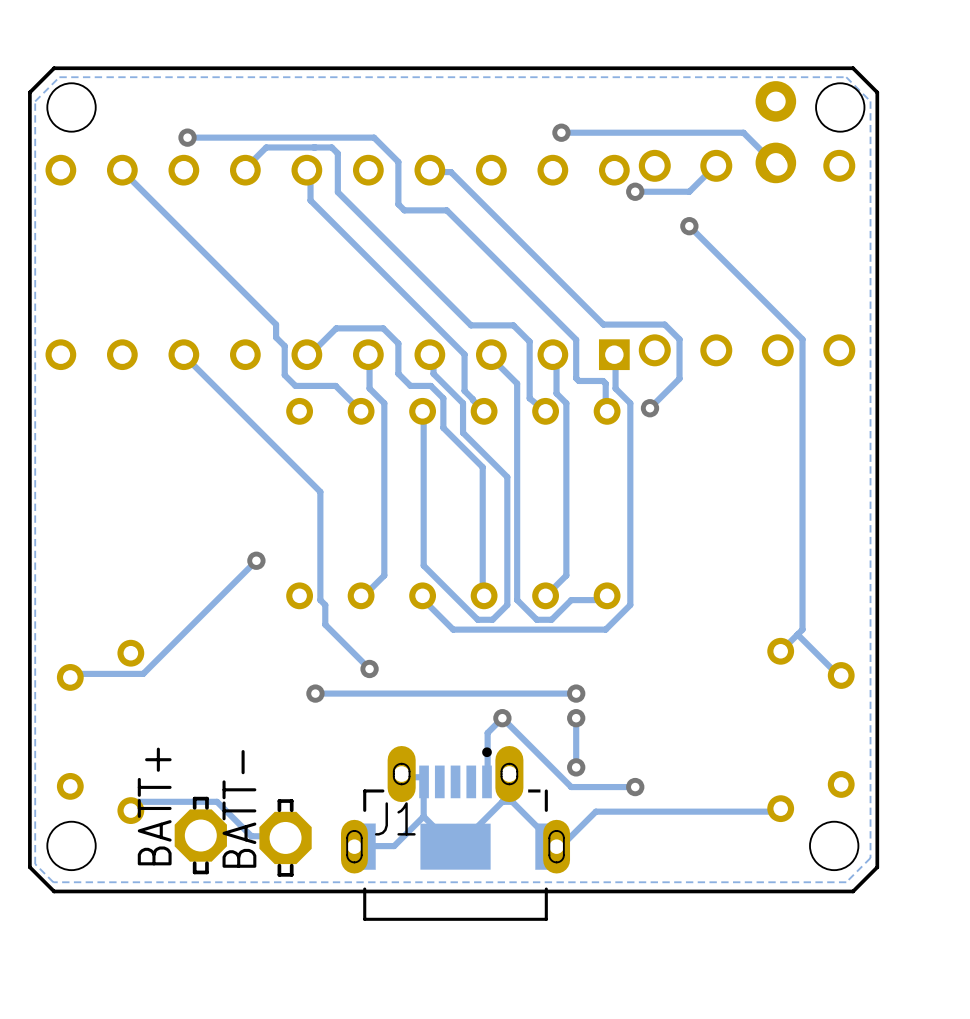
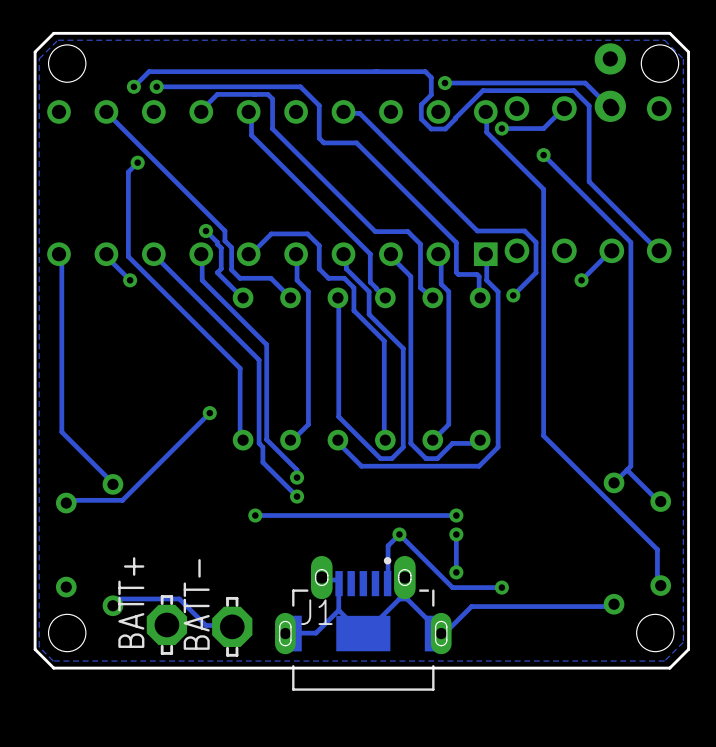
track: none -> (133, 86) (149, 71) (425, 71) (431, 77) (431, 94) (421, 104) (421, 119) (431, 129) (445, 129) (482, 90) (573, 90) (589, 105) (589, 181) (659, 250)
via: none -> (133, 86)
track: none -> (485, 111) (486, 132) (543, 189) (543, 435) (657, 549) (657, 583) (660, 585)
track: none -> (137, 162) (128, 172) (128, 256) (240, 368) (240, 439) (243, 440)
via: none -> (137, 162)
track: none -> (205, 230) (221, 247) (221, 268) (217, 272) (243, 297)
via: none -> (205, 230)
track: none -> (611, 250) (581, 280)
track: none -> (59, 254) (61, 257) (61, 432) (112, 484)
track: none -> (106, 254) (107, 257) (130, 280)
track: none -> (201, 254) (202, 280) (266, 344) (266, 439) (297, 469) (297, 477)
via: none -> (130, 280)
via: none -> (581, 280)
via: none -> (297, 477)

